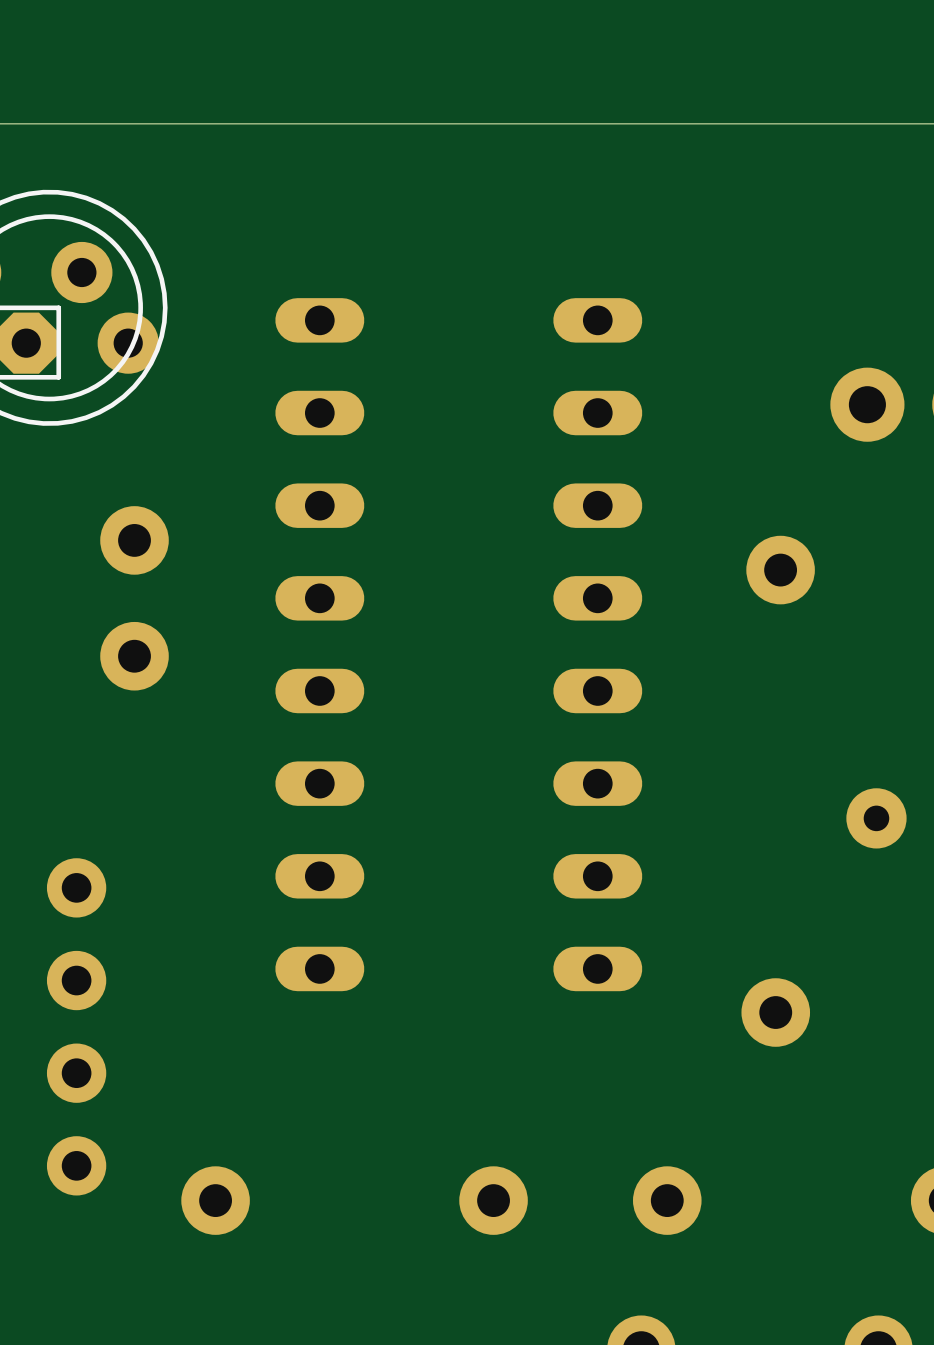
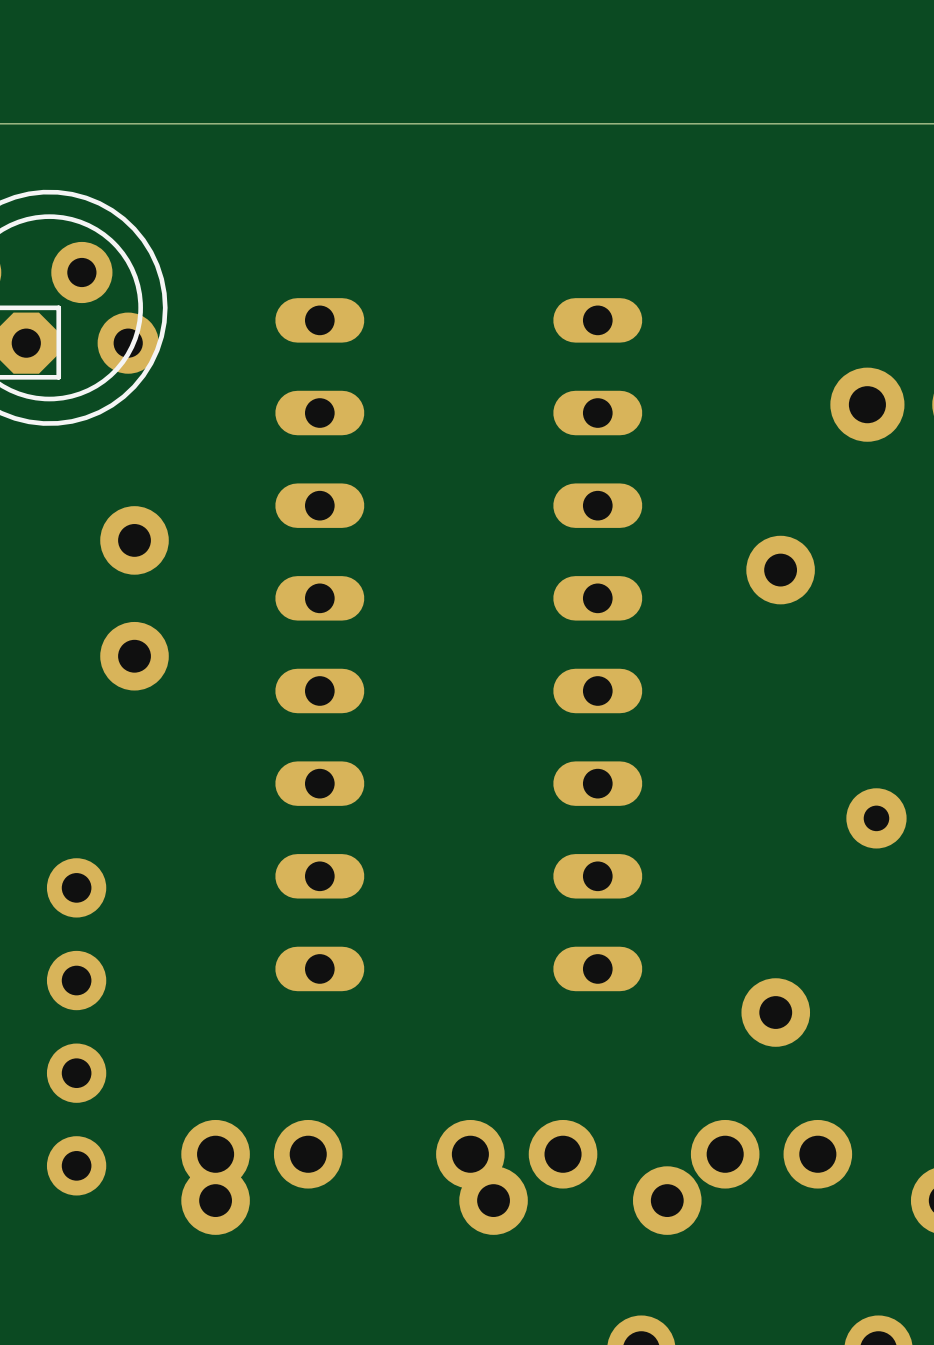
part: none -> (261, 1154)
part: none -> (516, 1154)
part: none -> (771, 1154)

